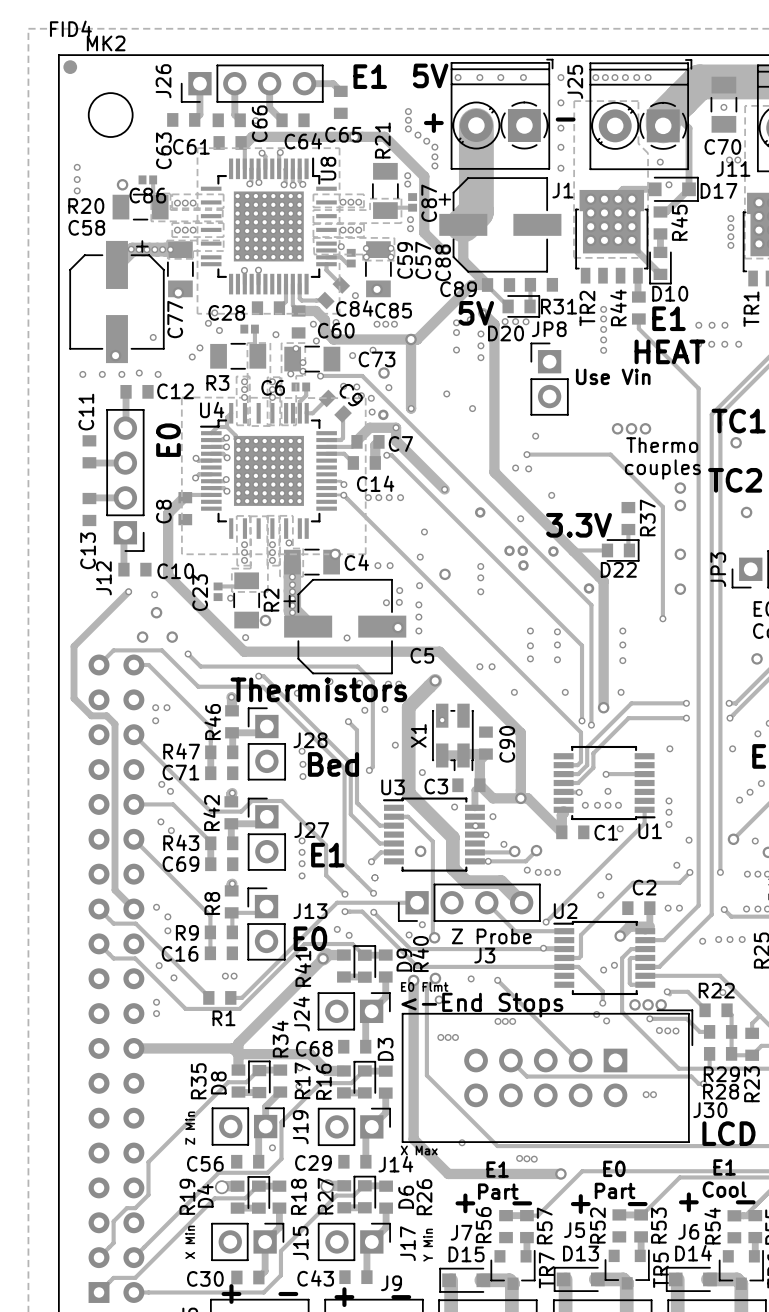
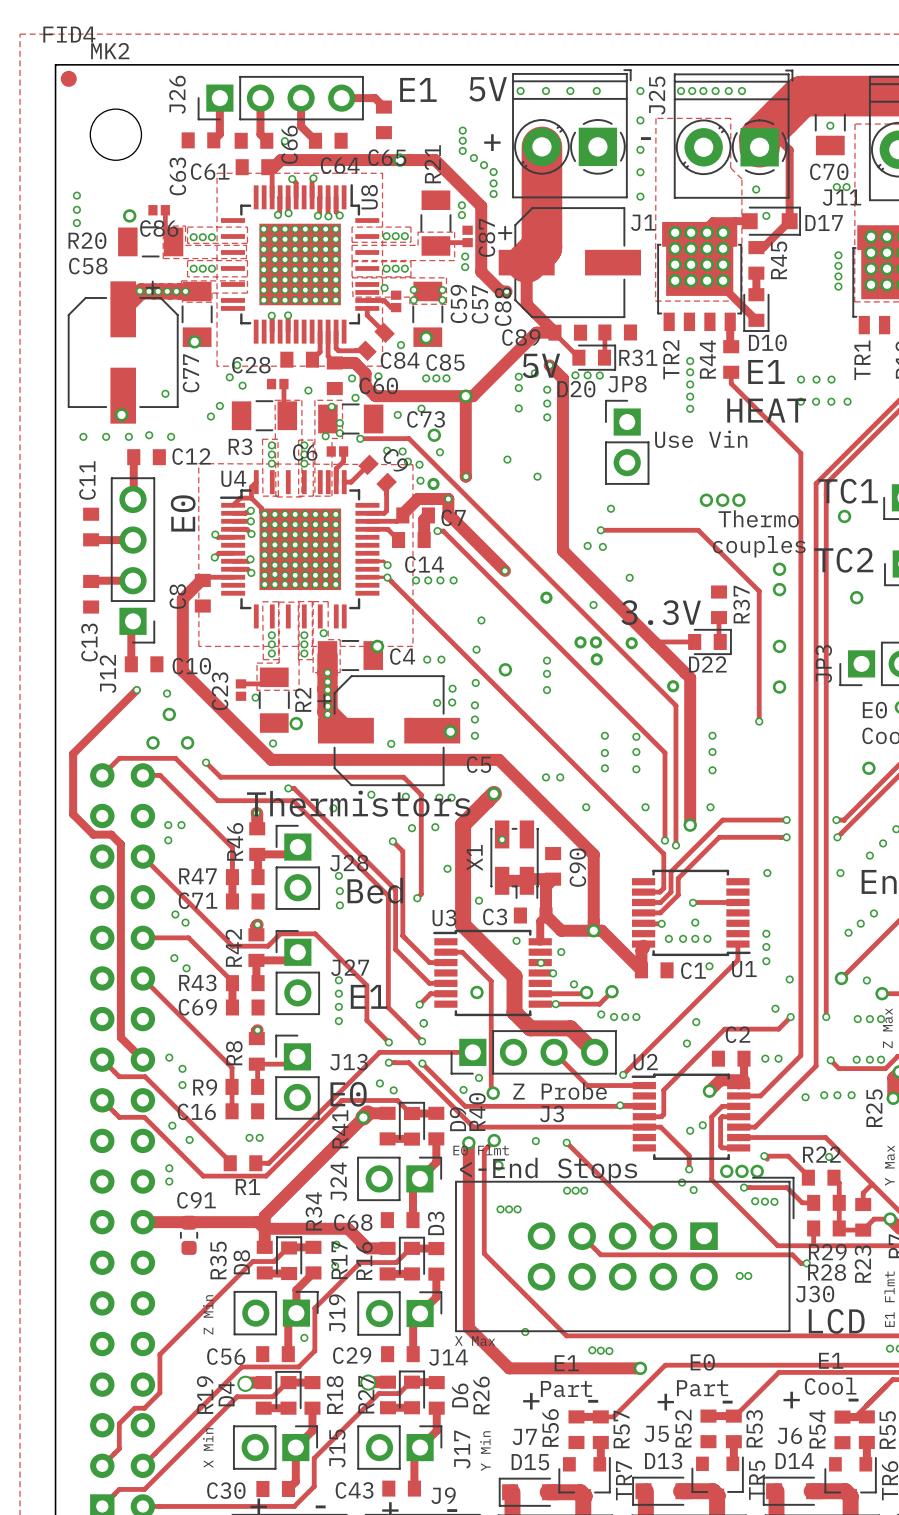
C91: none -> (189, 1235)

